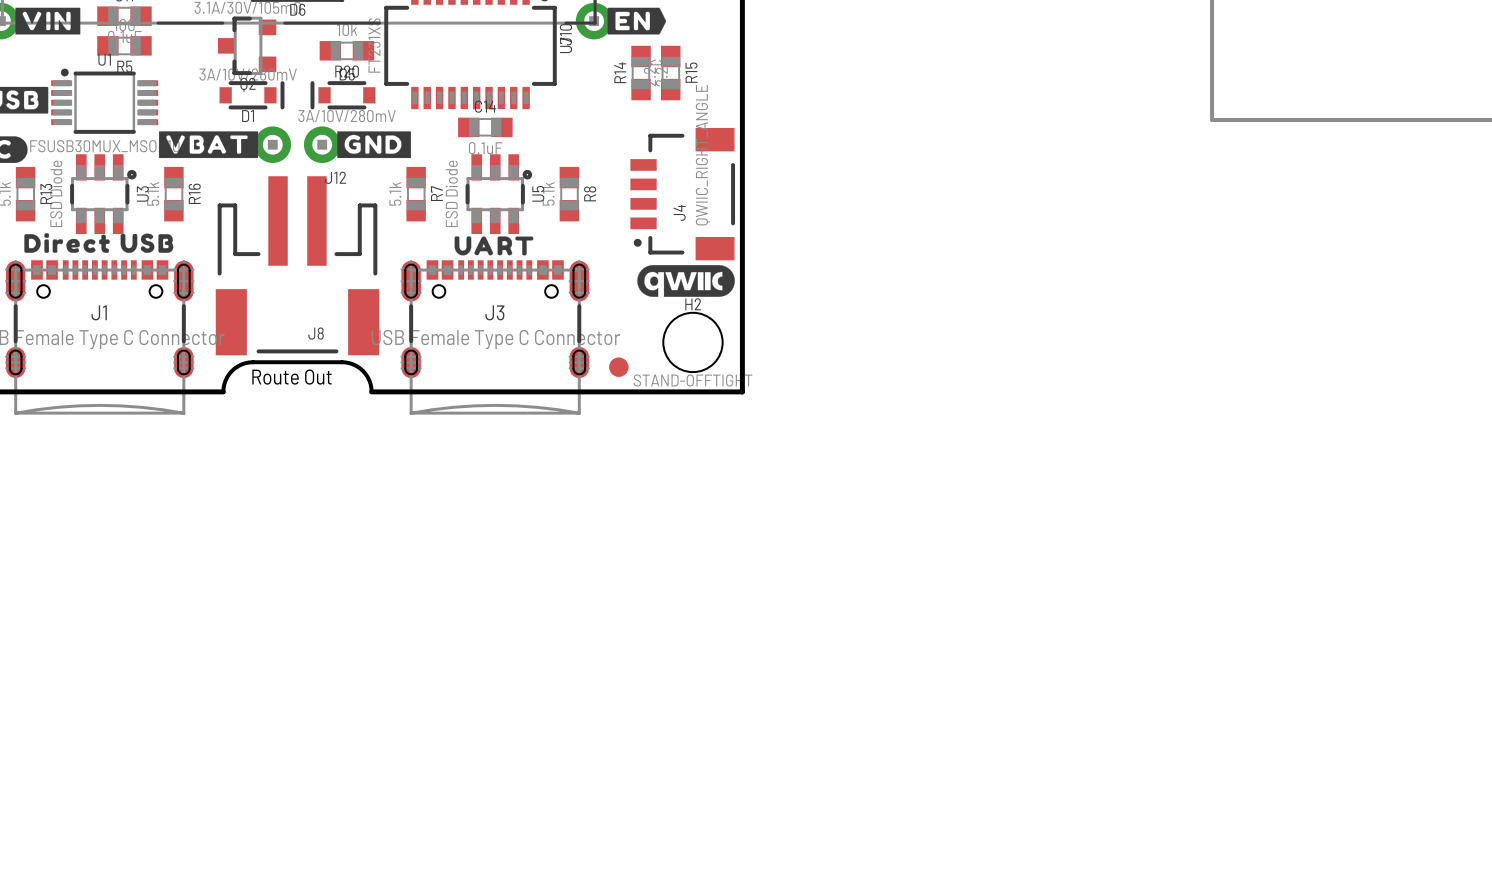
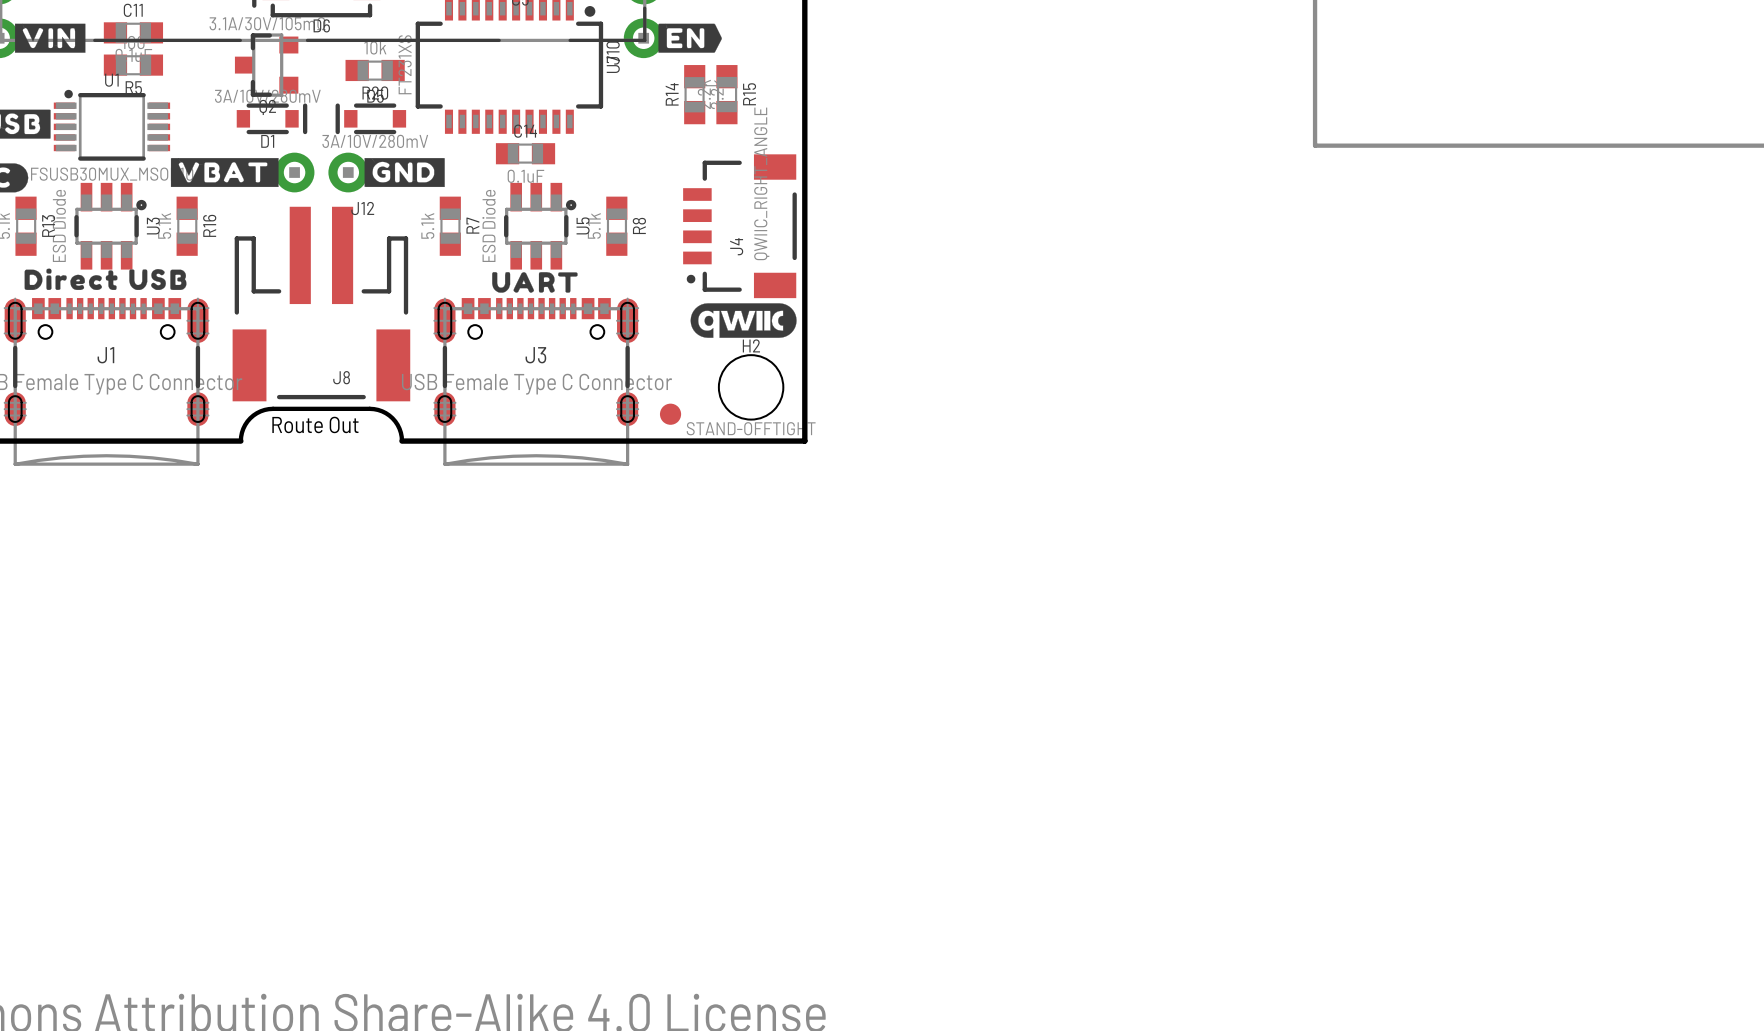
line: none -> (94, 40) (169, 40)
line: none -> (410, 40) (499, 40)
line: none -> (570, 40) (613, 40)

